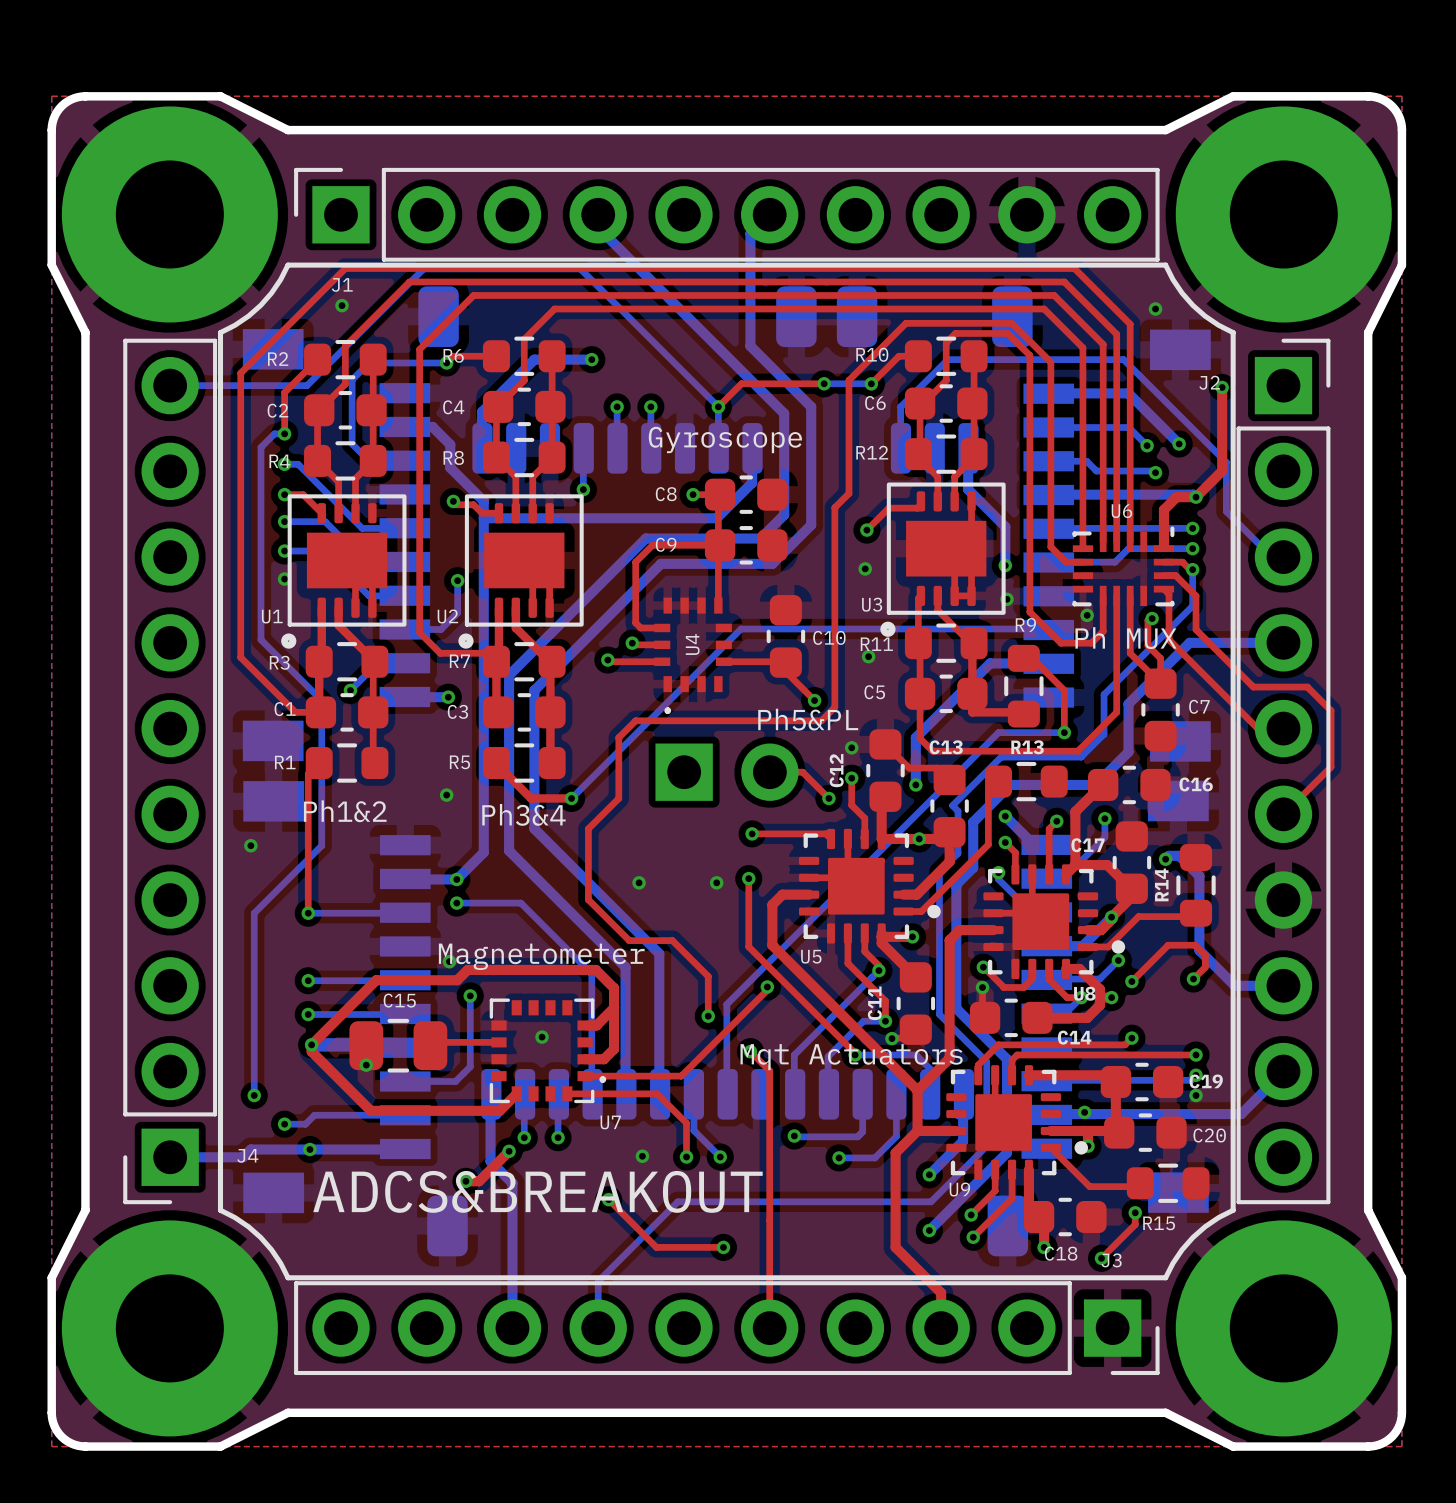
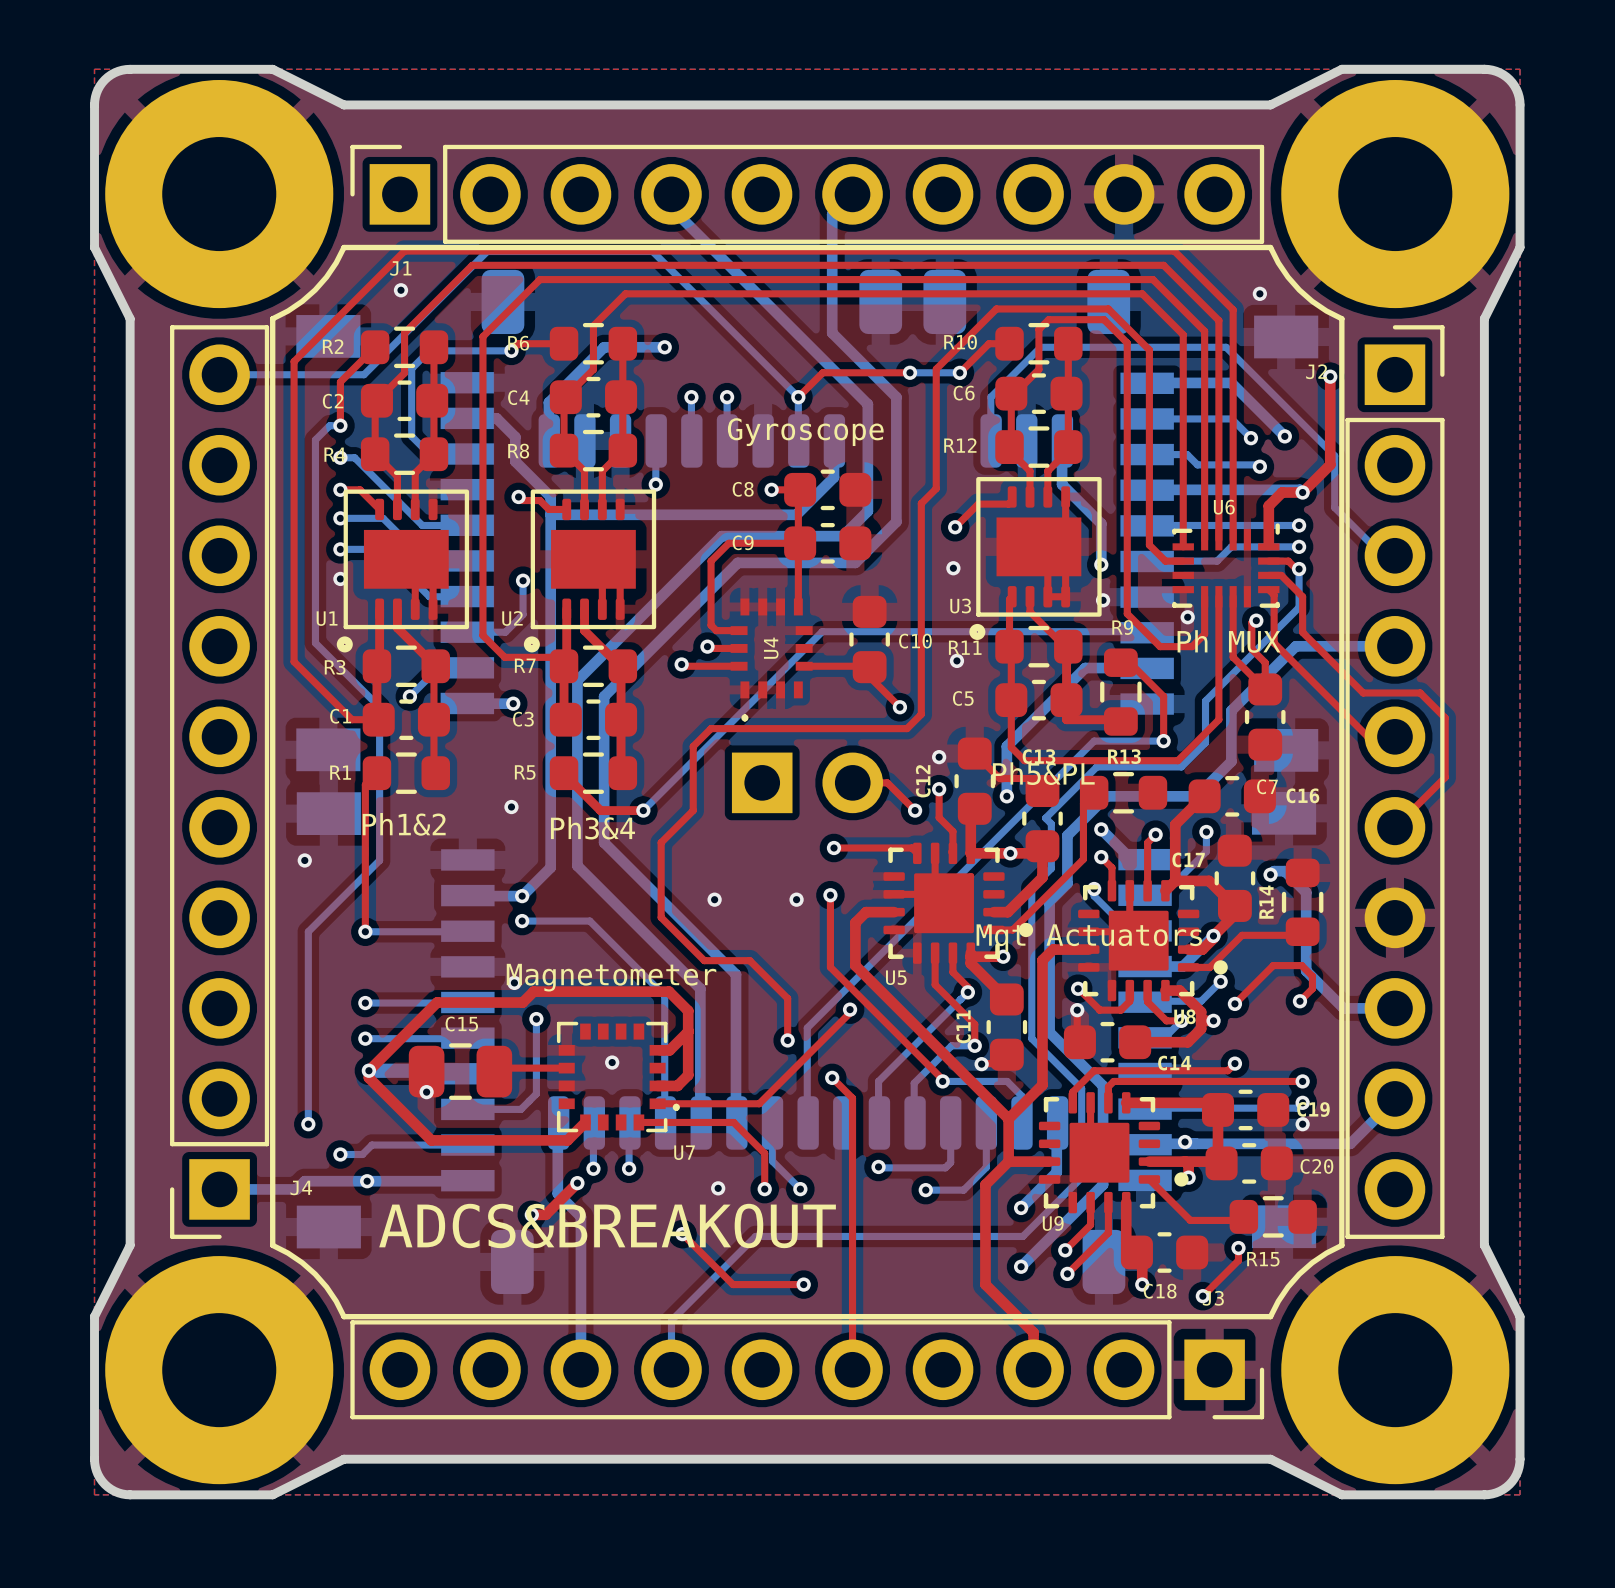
C7 name position: C7 (1199, 706) -> C7 (1267, 786)
text position: Ph5&PL (808, 719) -> Ph5&PL (1043, 773)
text position: Mqt Actuators (851, 1057) -> Mqt Actuators (1089, 938)

